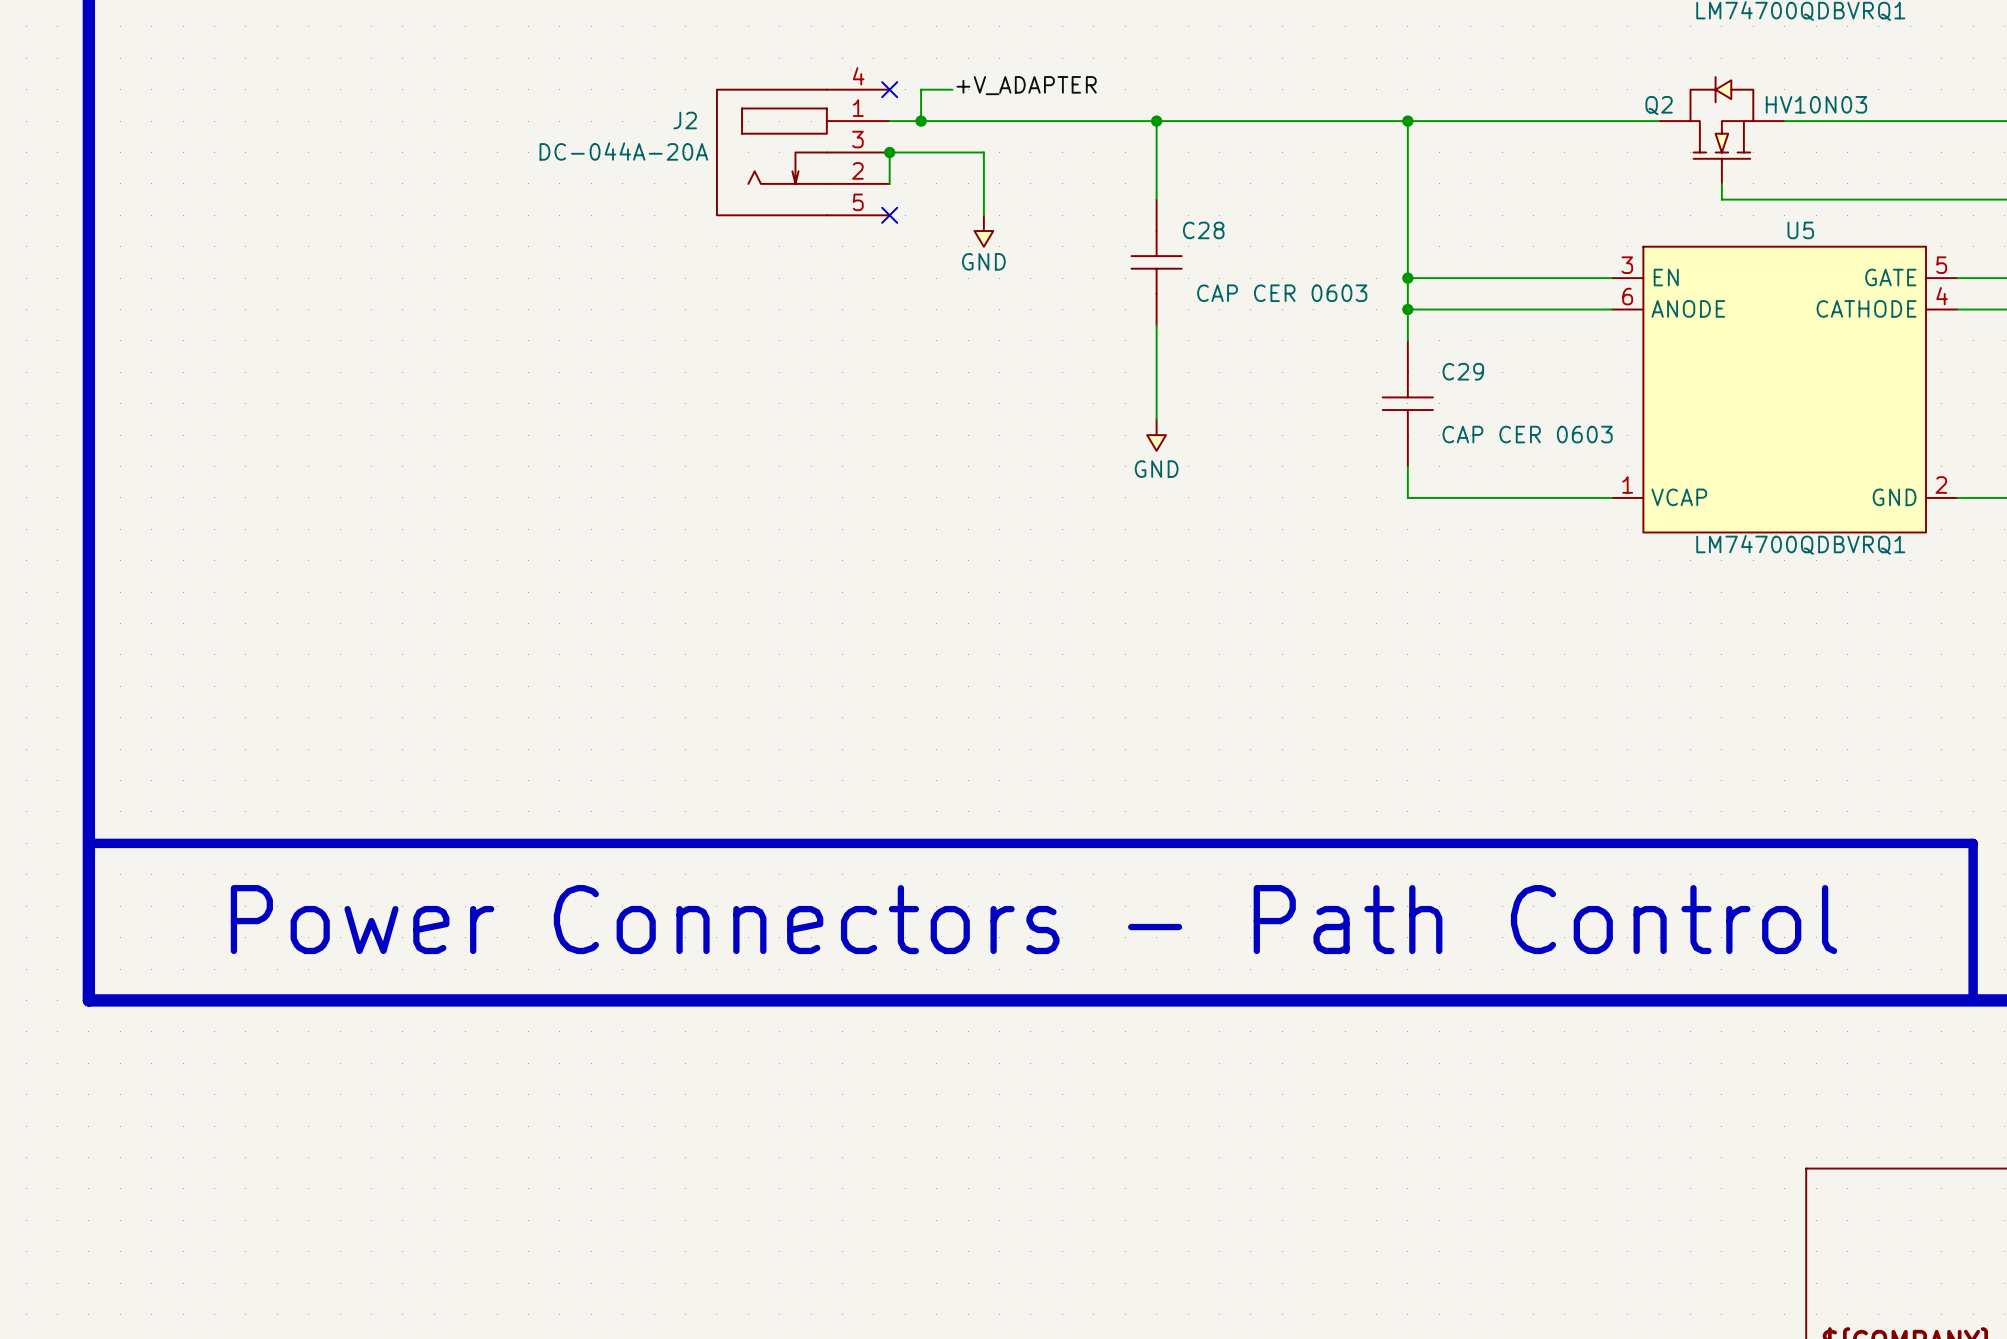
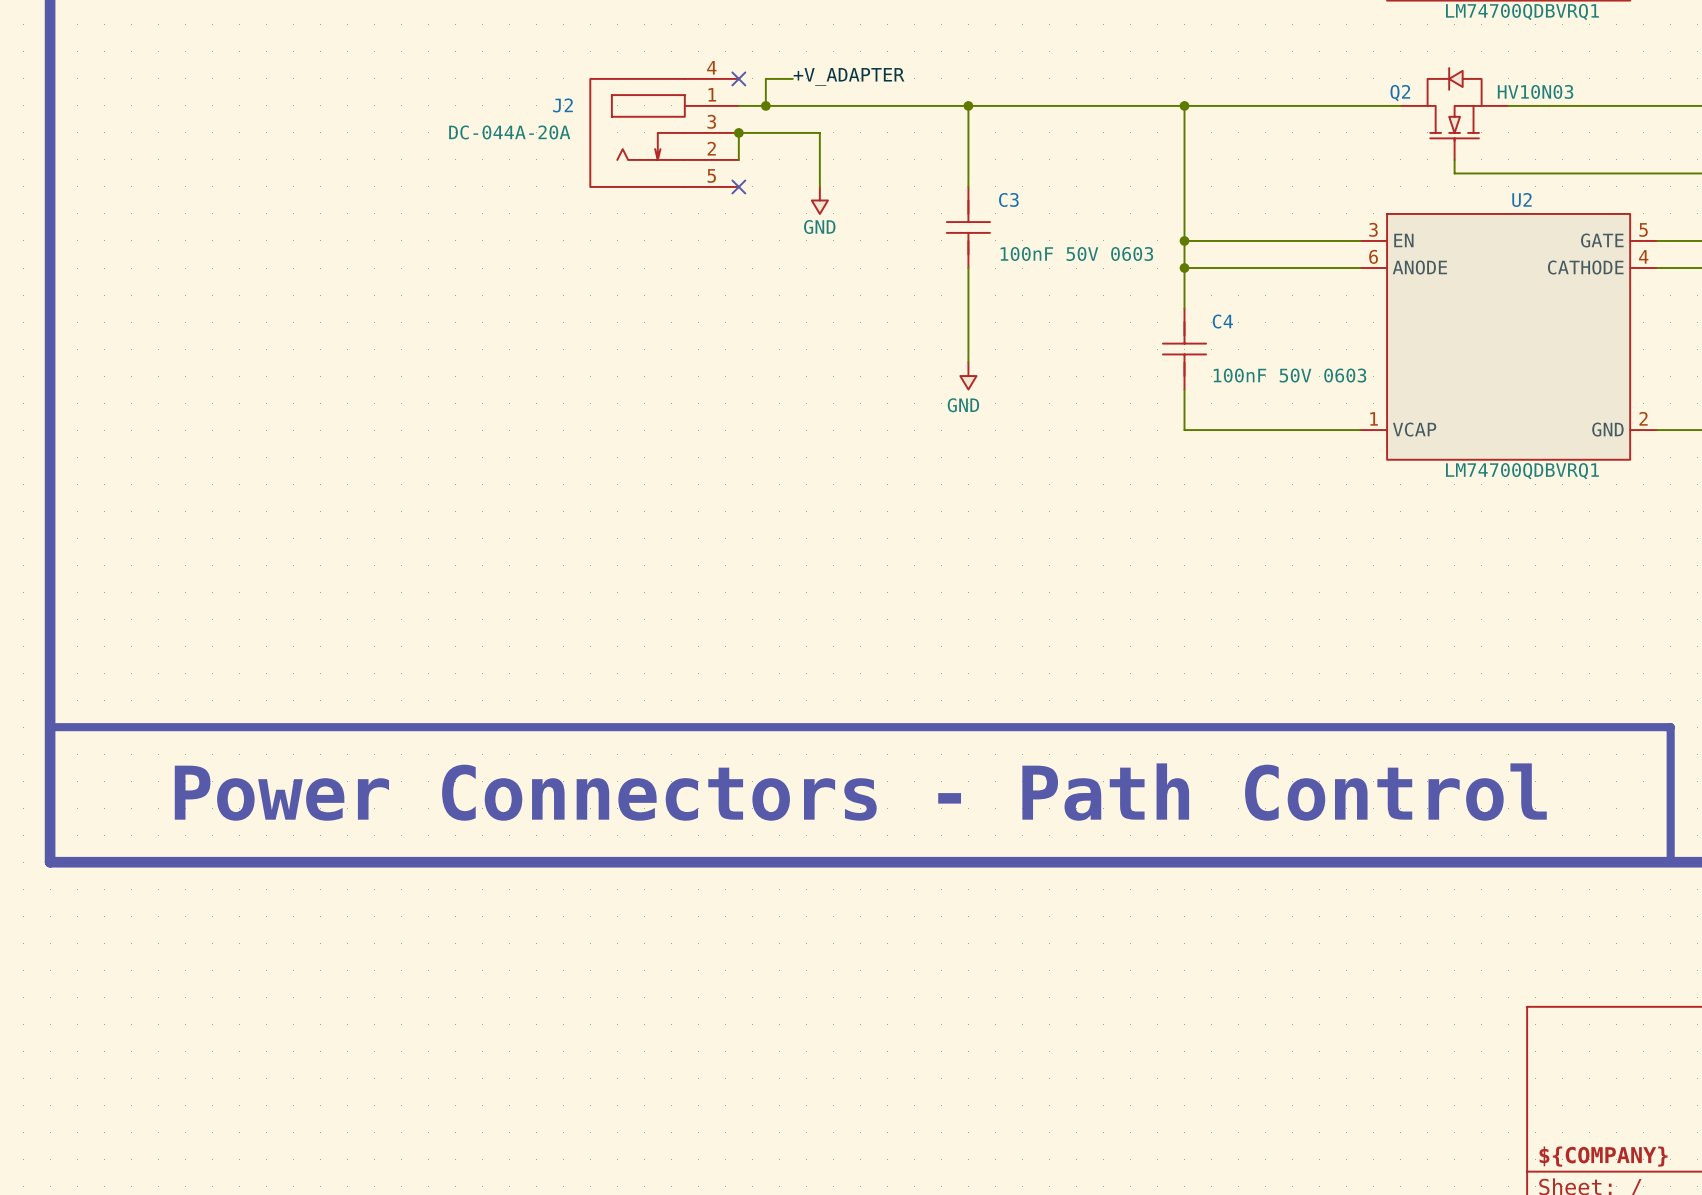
U5 name: U5 (1800, 230) -> U2 (1522, 199)
C28: CAP CER 0603 (1156, 262) -> none
C3: none -> 100nF 50V 0603 (968, 227)
C29: CAP CER 0603 (1407, 403) -> none
C4: none -> 100nF 50V 0603 (1184, 349)

